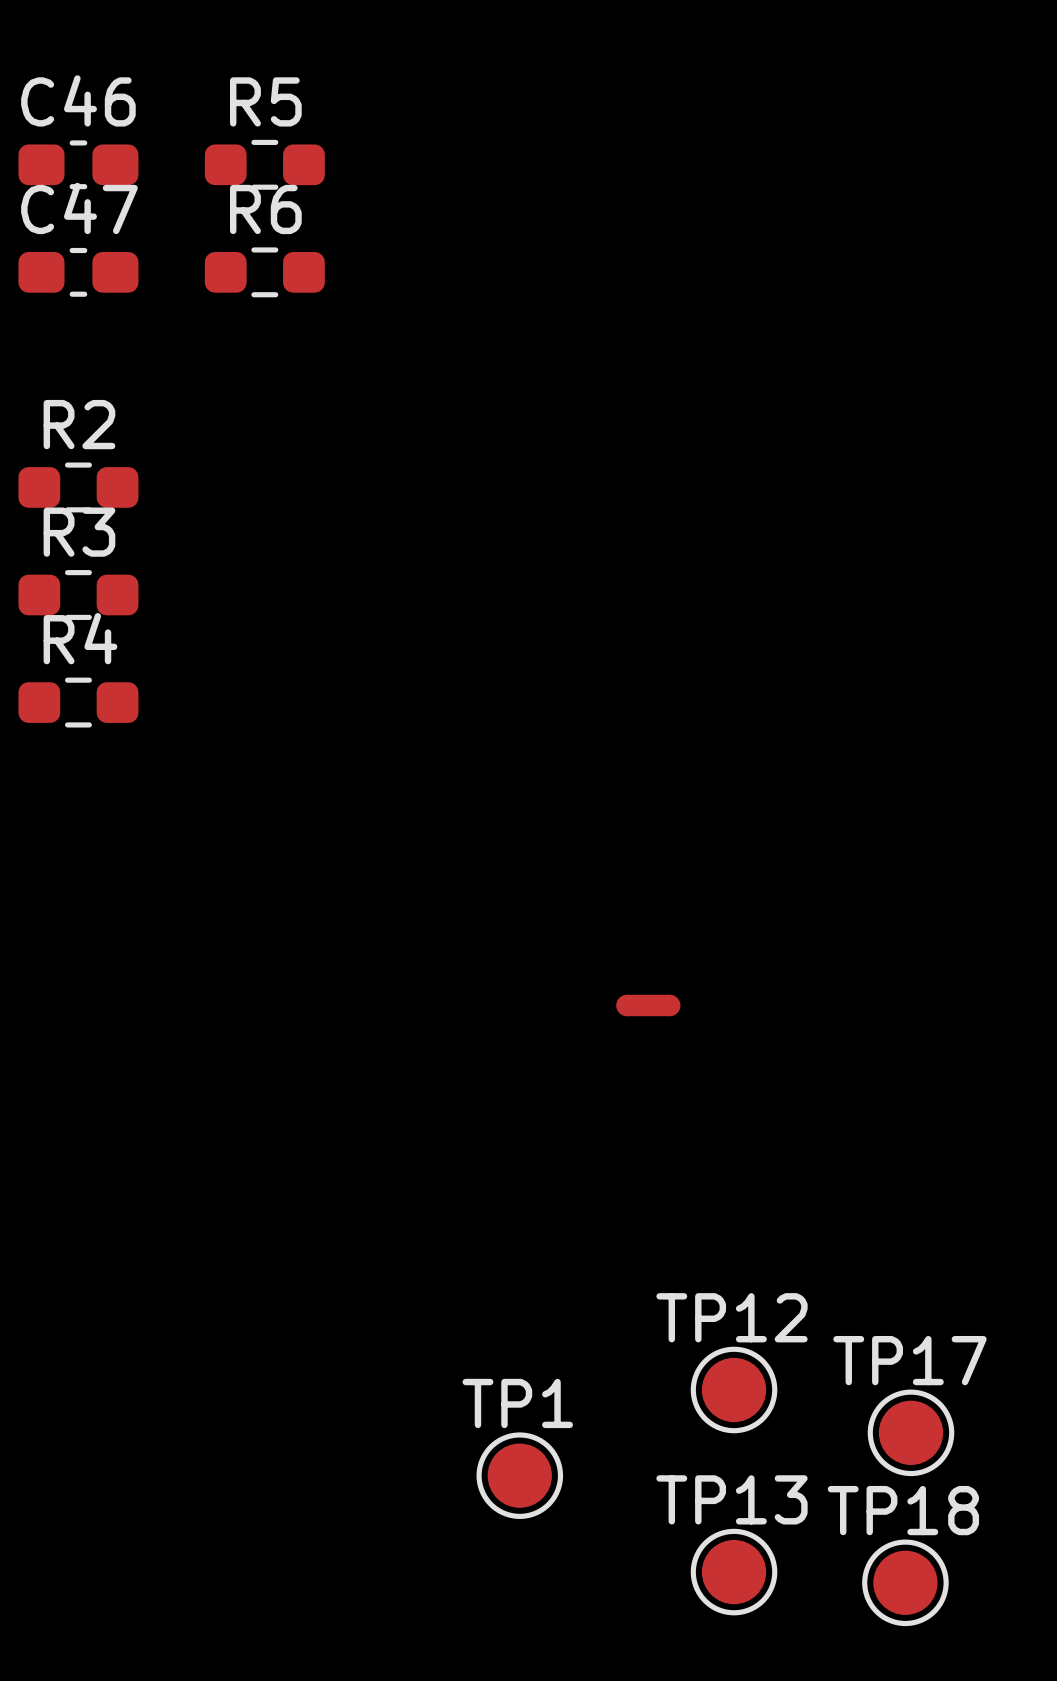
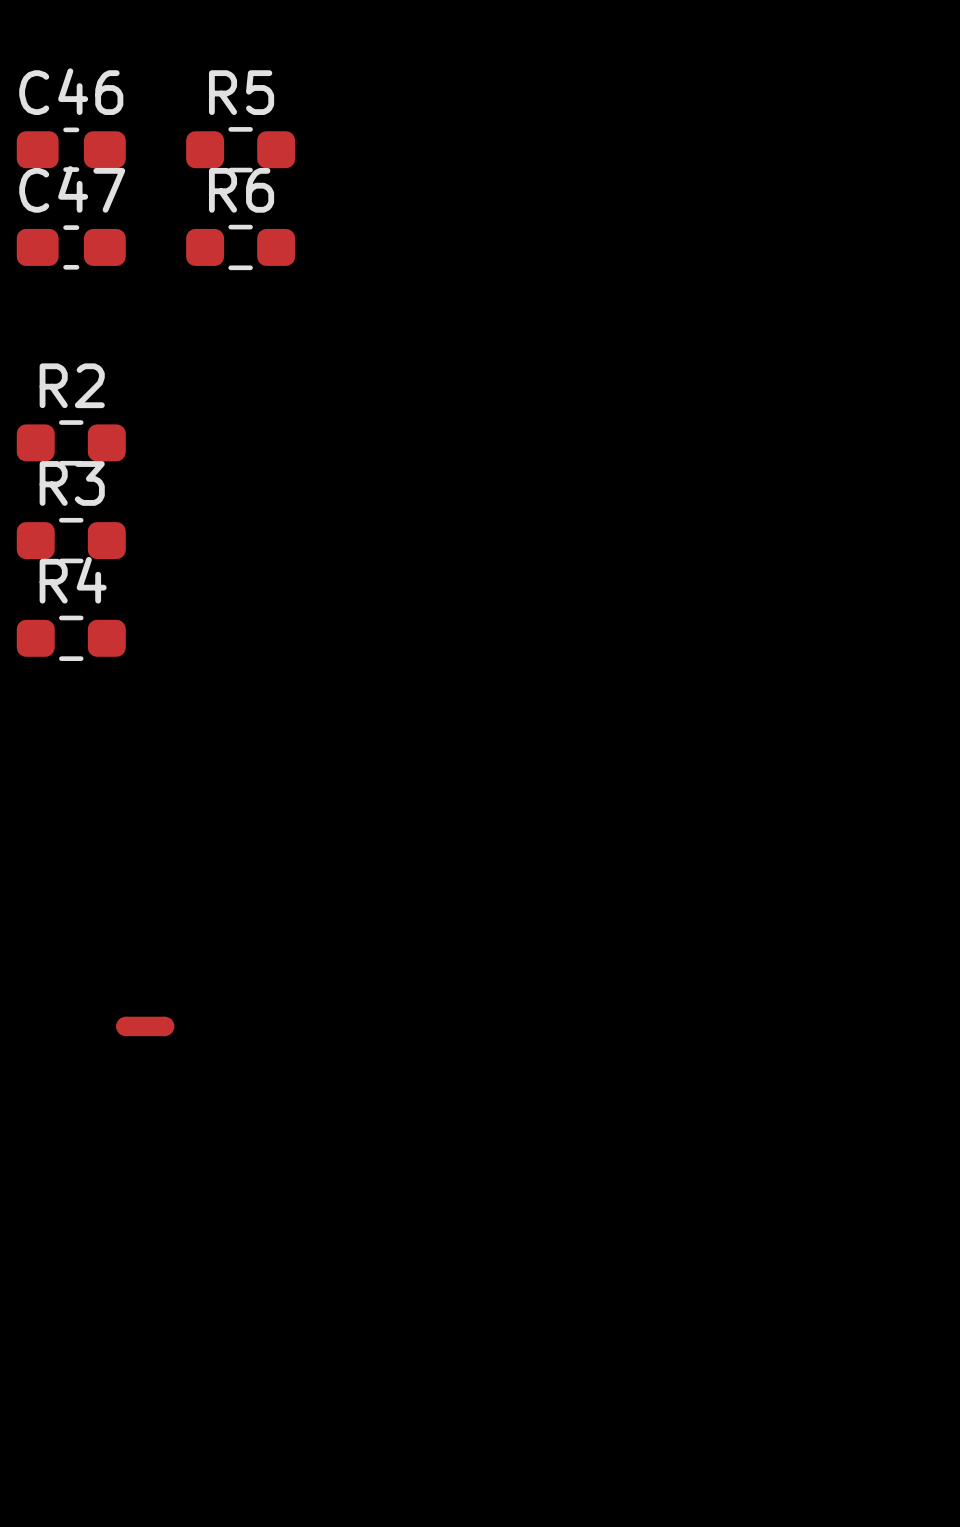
part position: (648, 1005) -> (145, 1026)
TP12: (734, 1389) -> none
TP17: (910, 1432) -> none
TP1: (519, 1475) -> none
TP13: (734, 1572) -> none
TP18: (905, 1582) -> none

